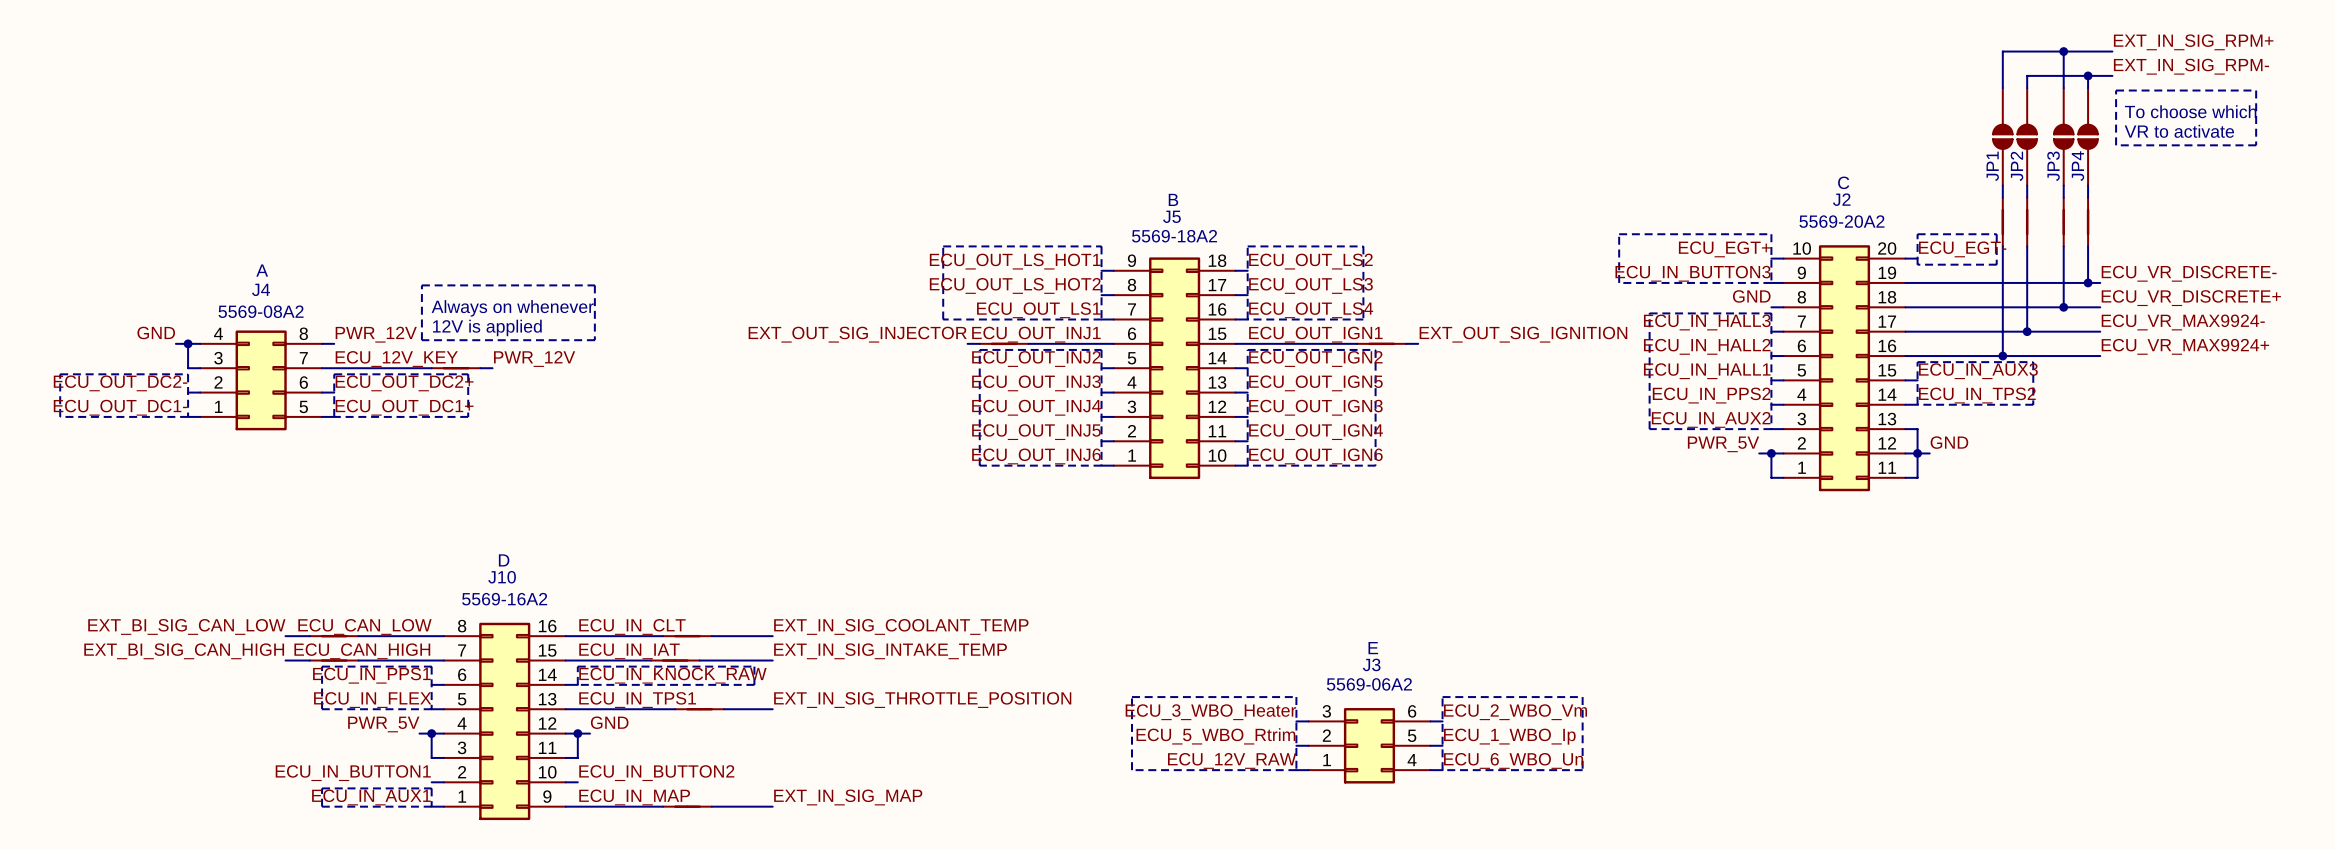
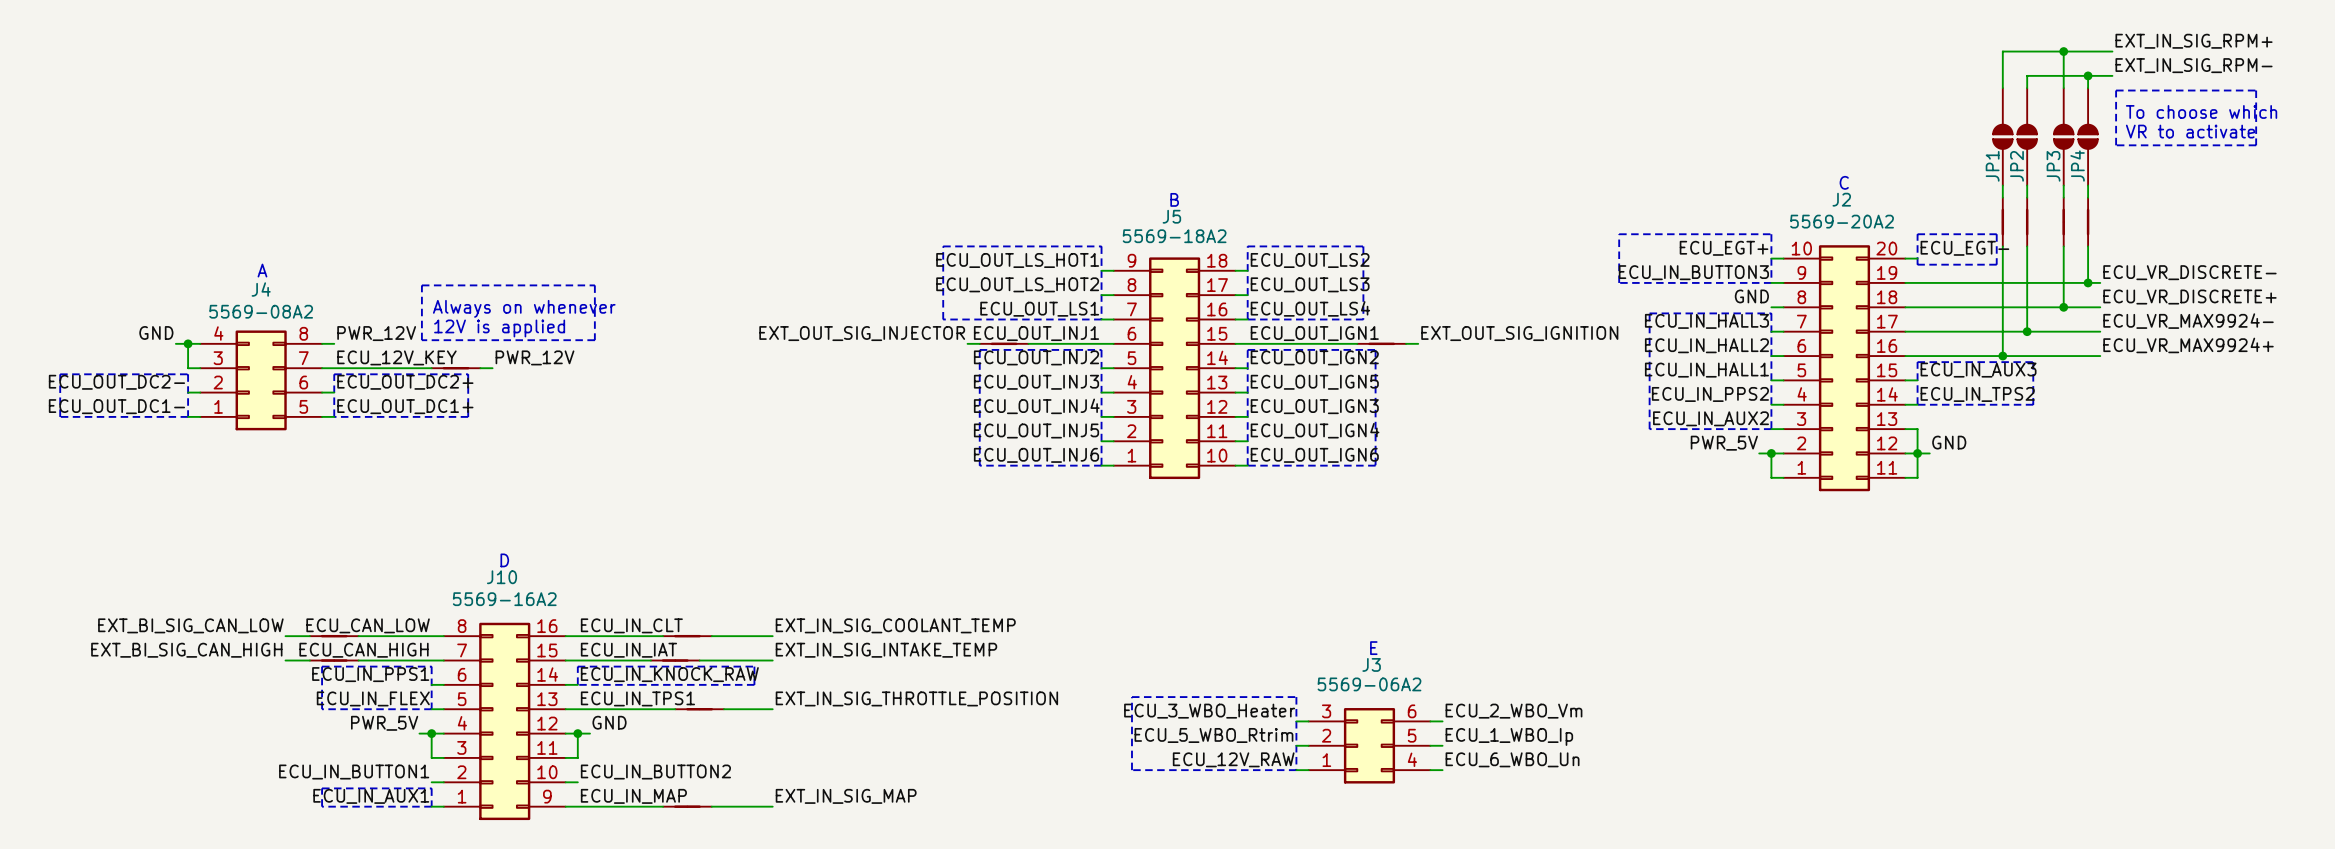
line: (1442, 697) (1582, 697) (1582, 770) (1442, 770) (1442, 697) -> none

